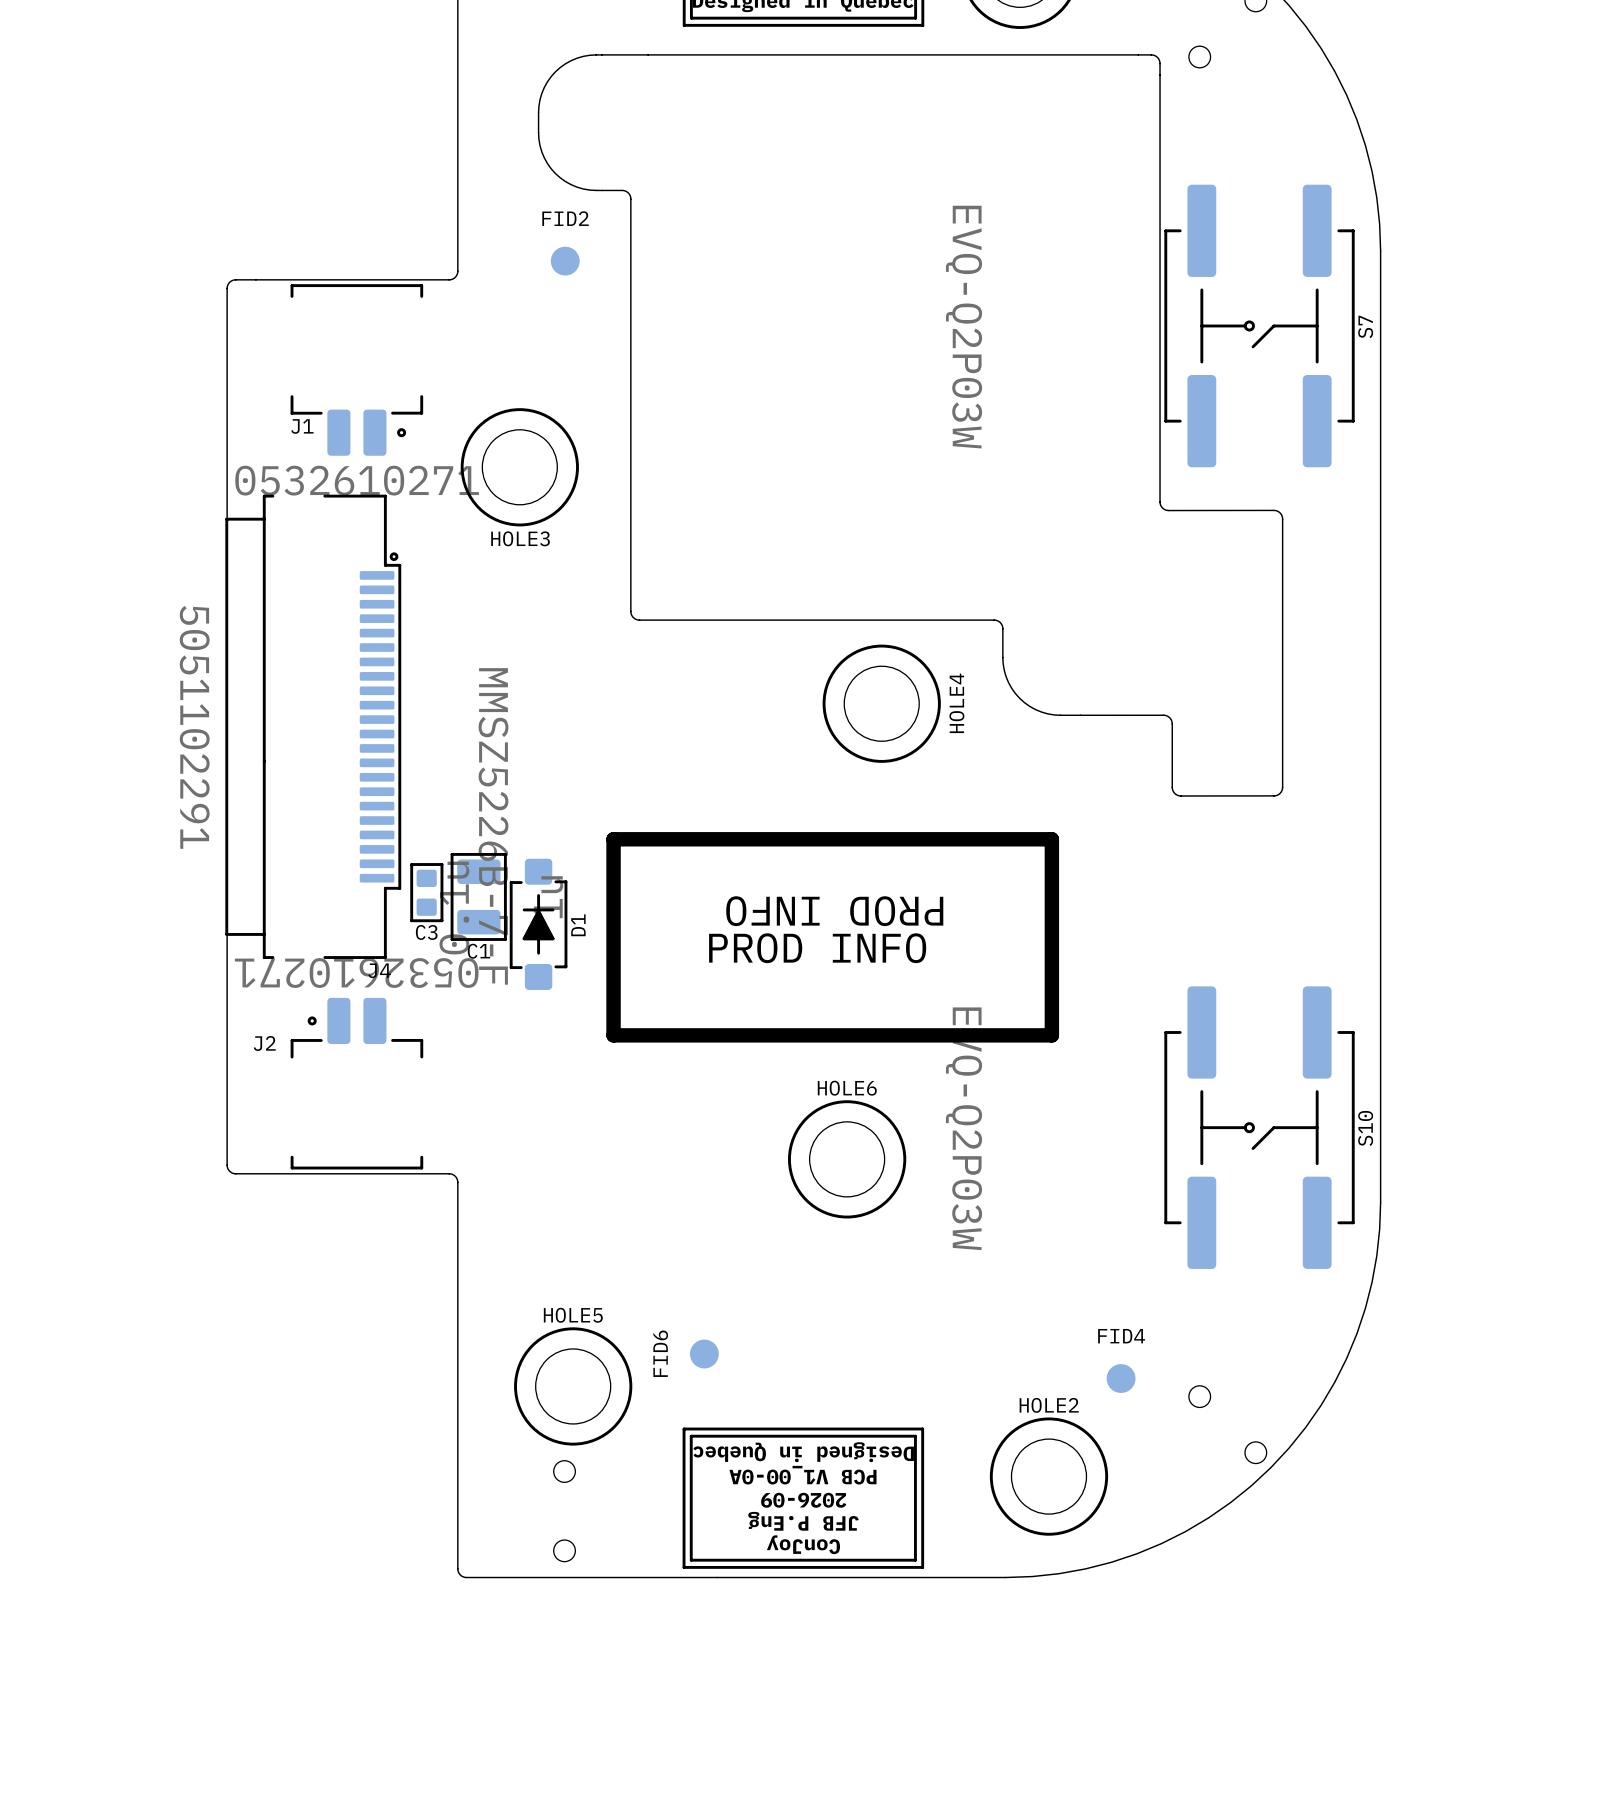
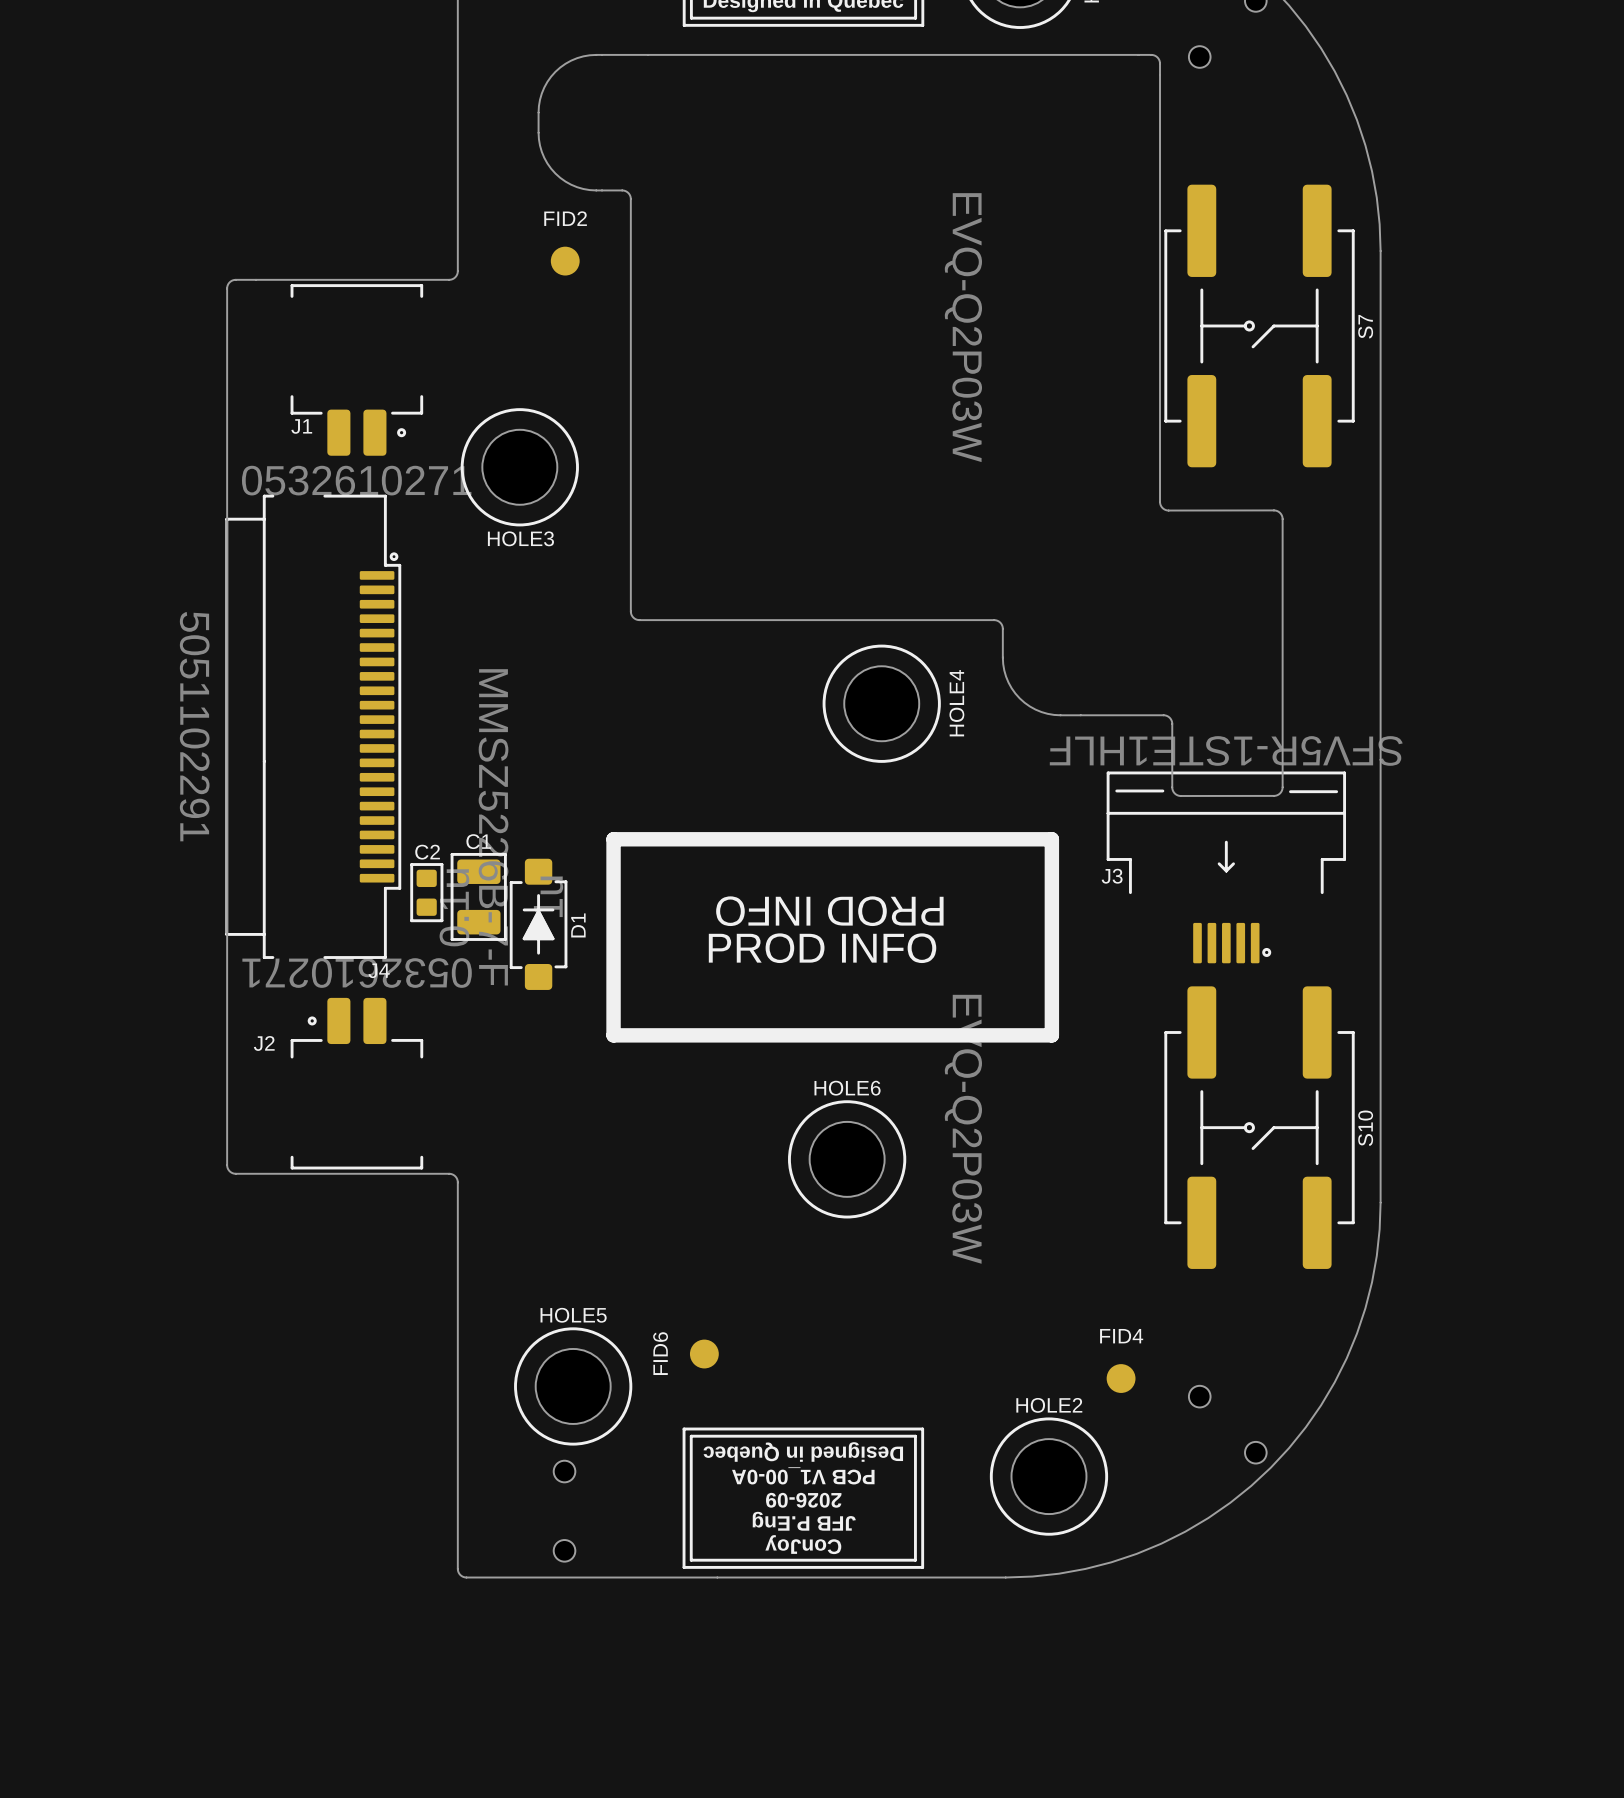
J3: none -> SFV5R-1STE1HLF (1226, 867)
C3 name: C3 (426, 932) -> C2 (427, 852)
C1 name position: C1 (478, 951) -> C1 (478, 841)

